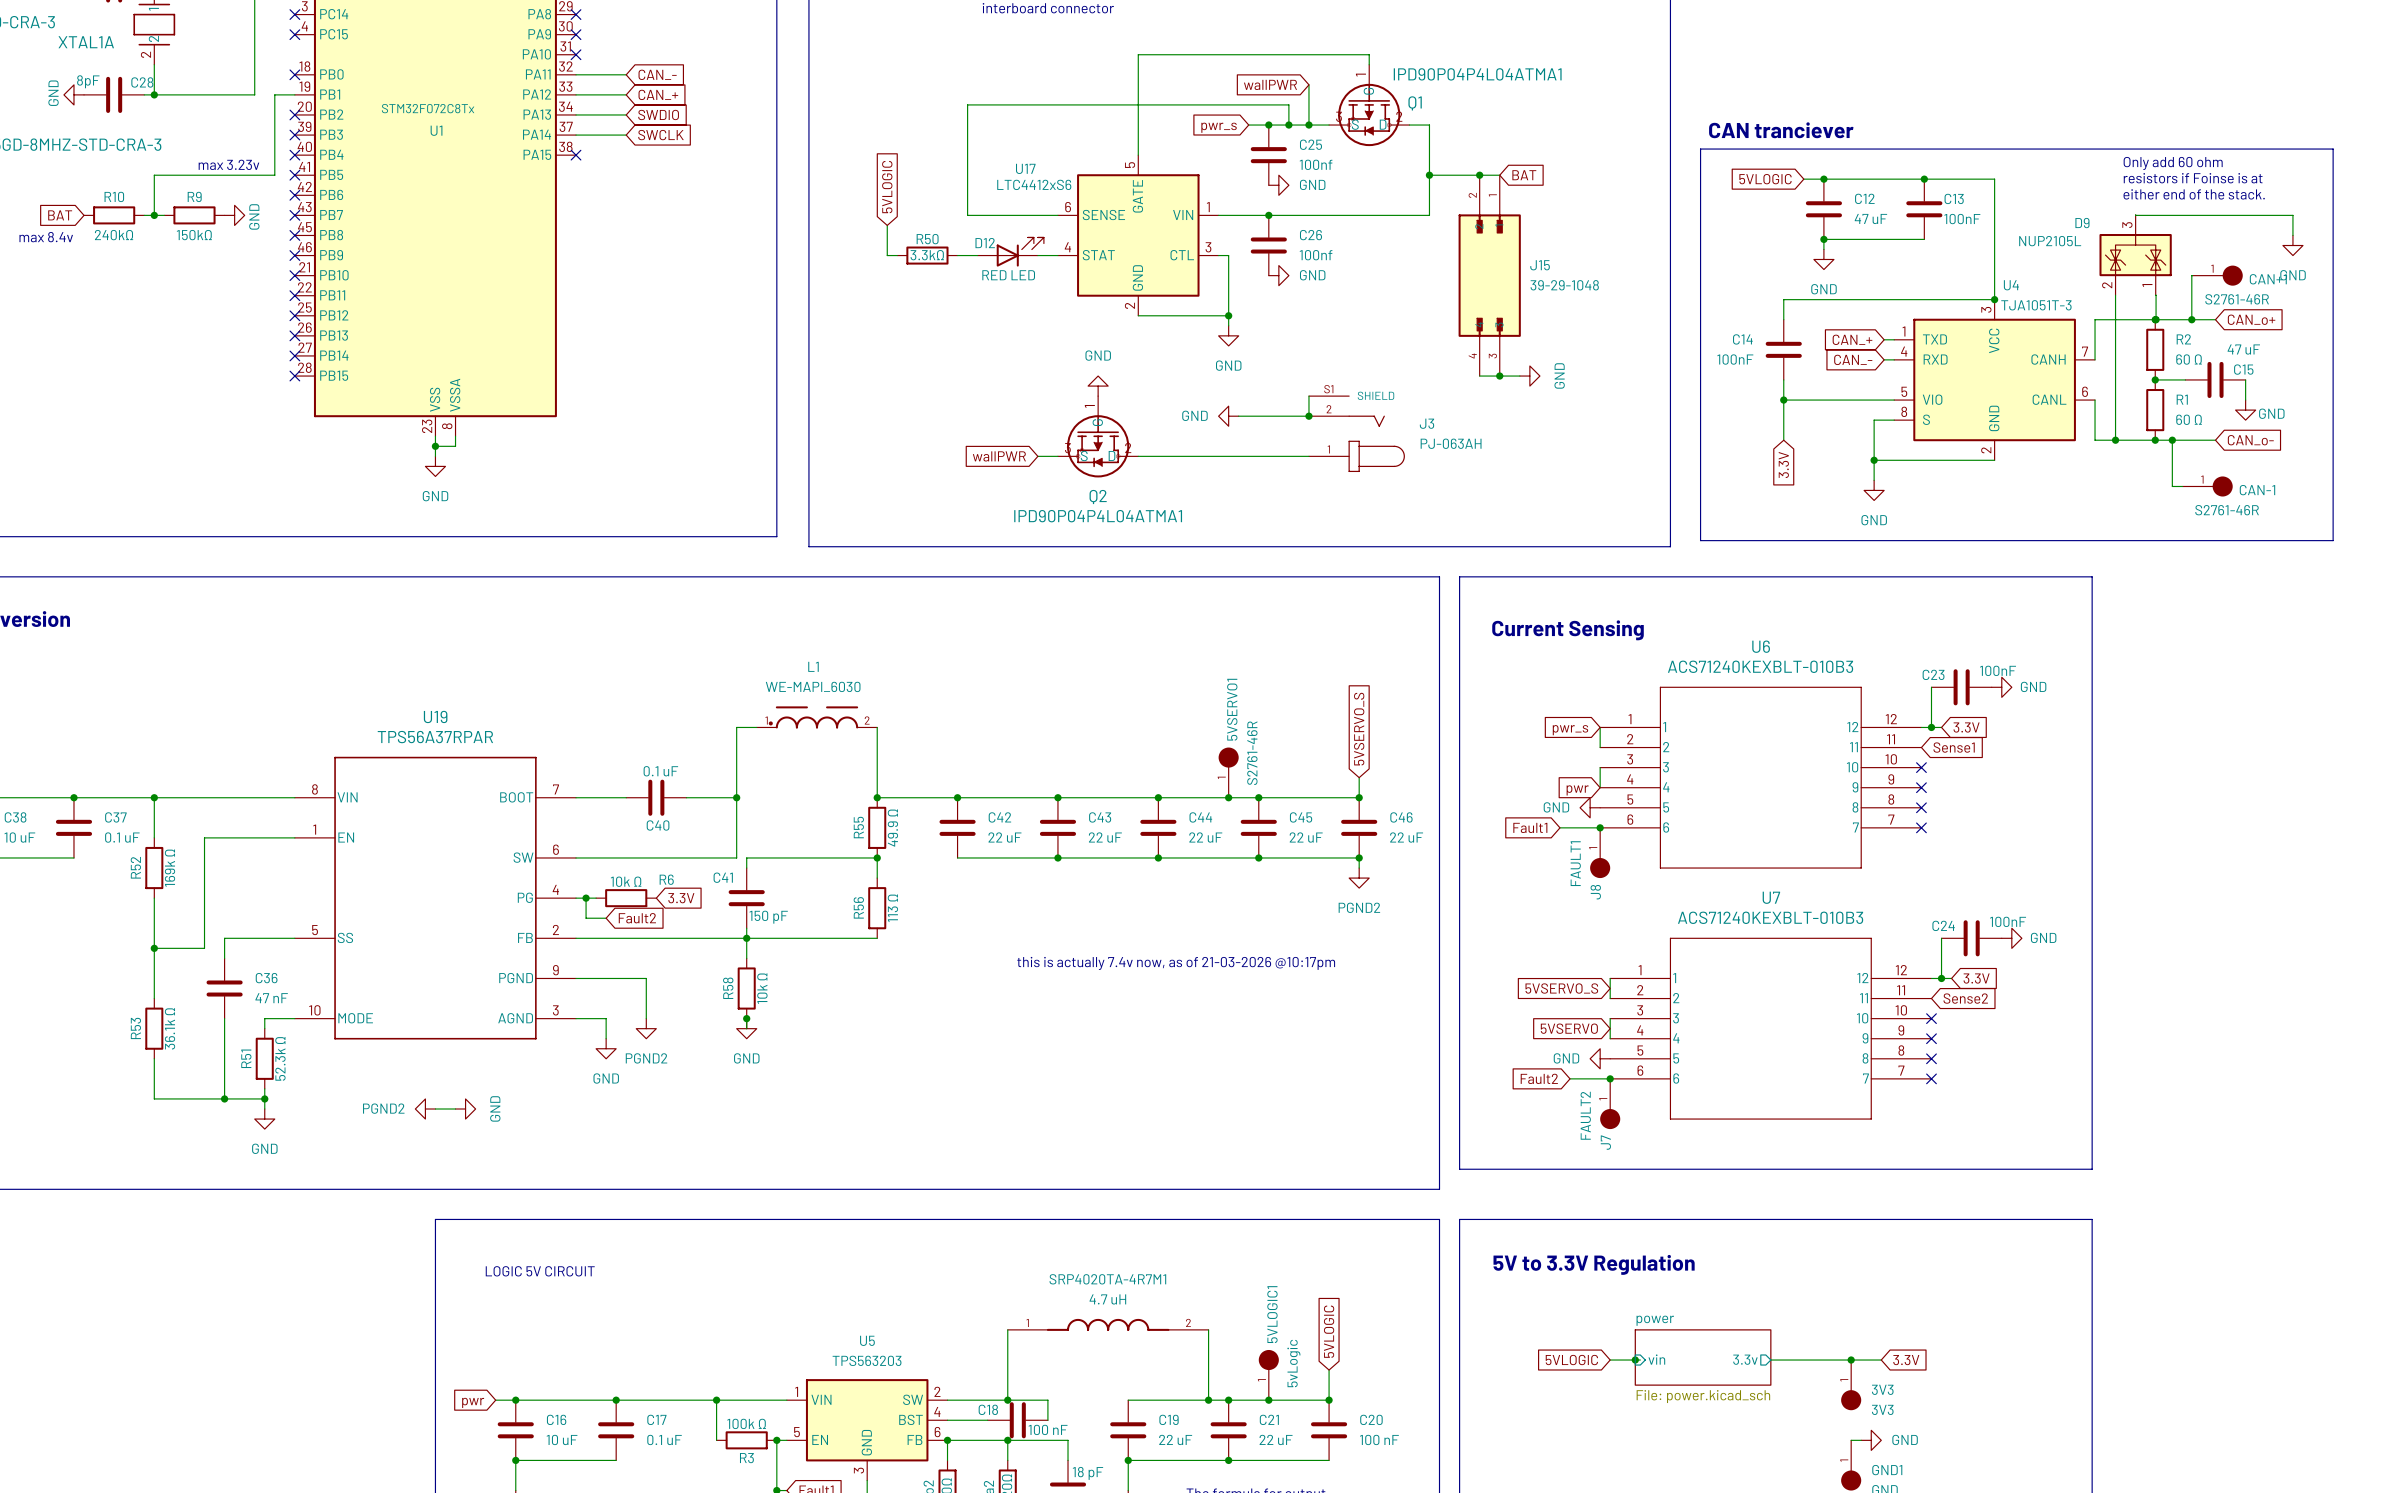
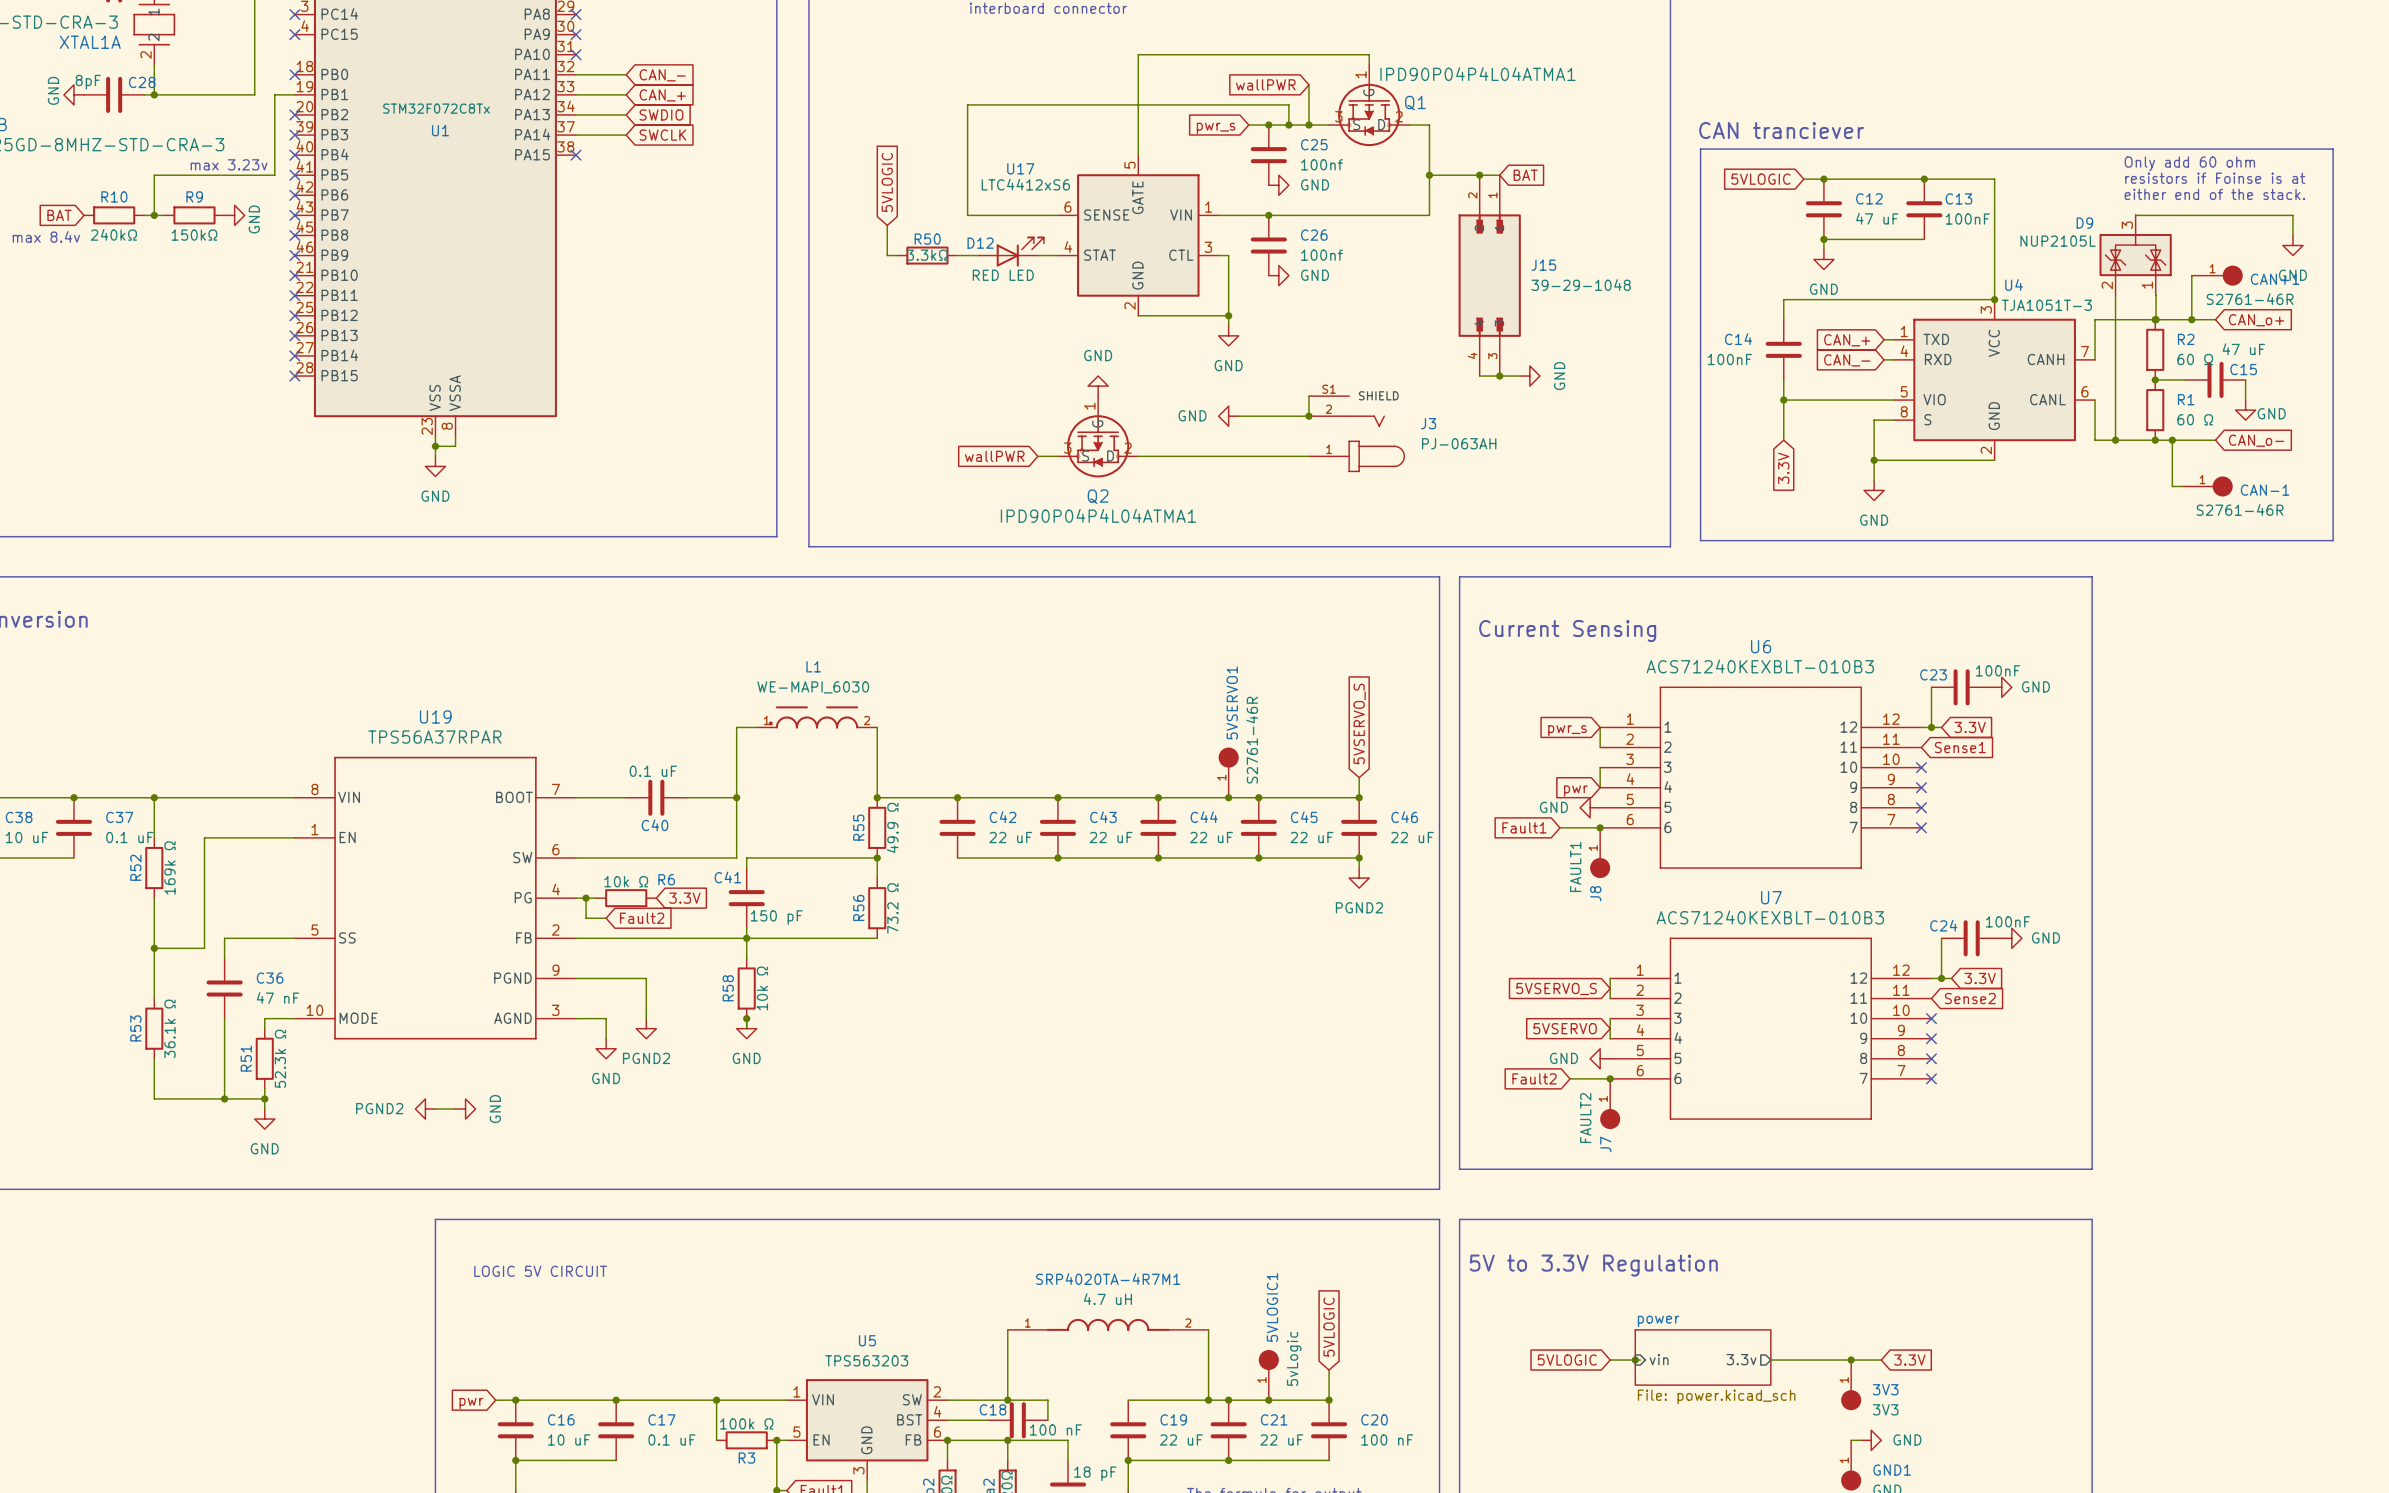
R56 value: 113 Ω (892, 908) -> 73.2 Ω (892, 908)
text: this is actually 7.4v now, as of 21-03-2026 @10:17pm (1176, 963) -> none

